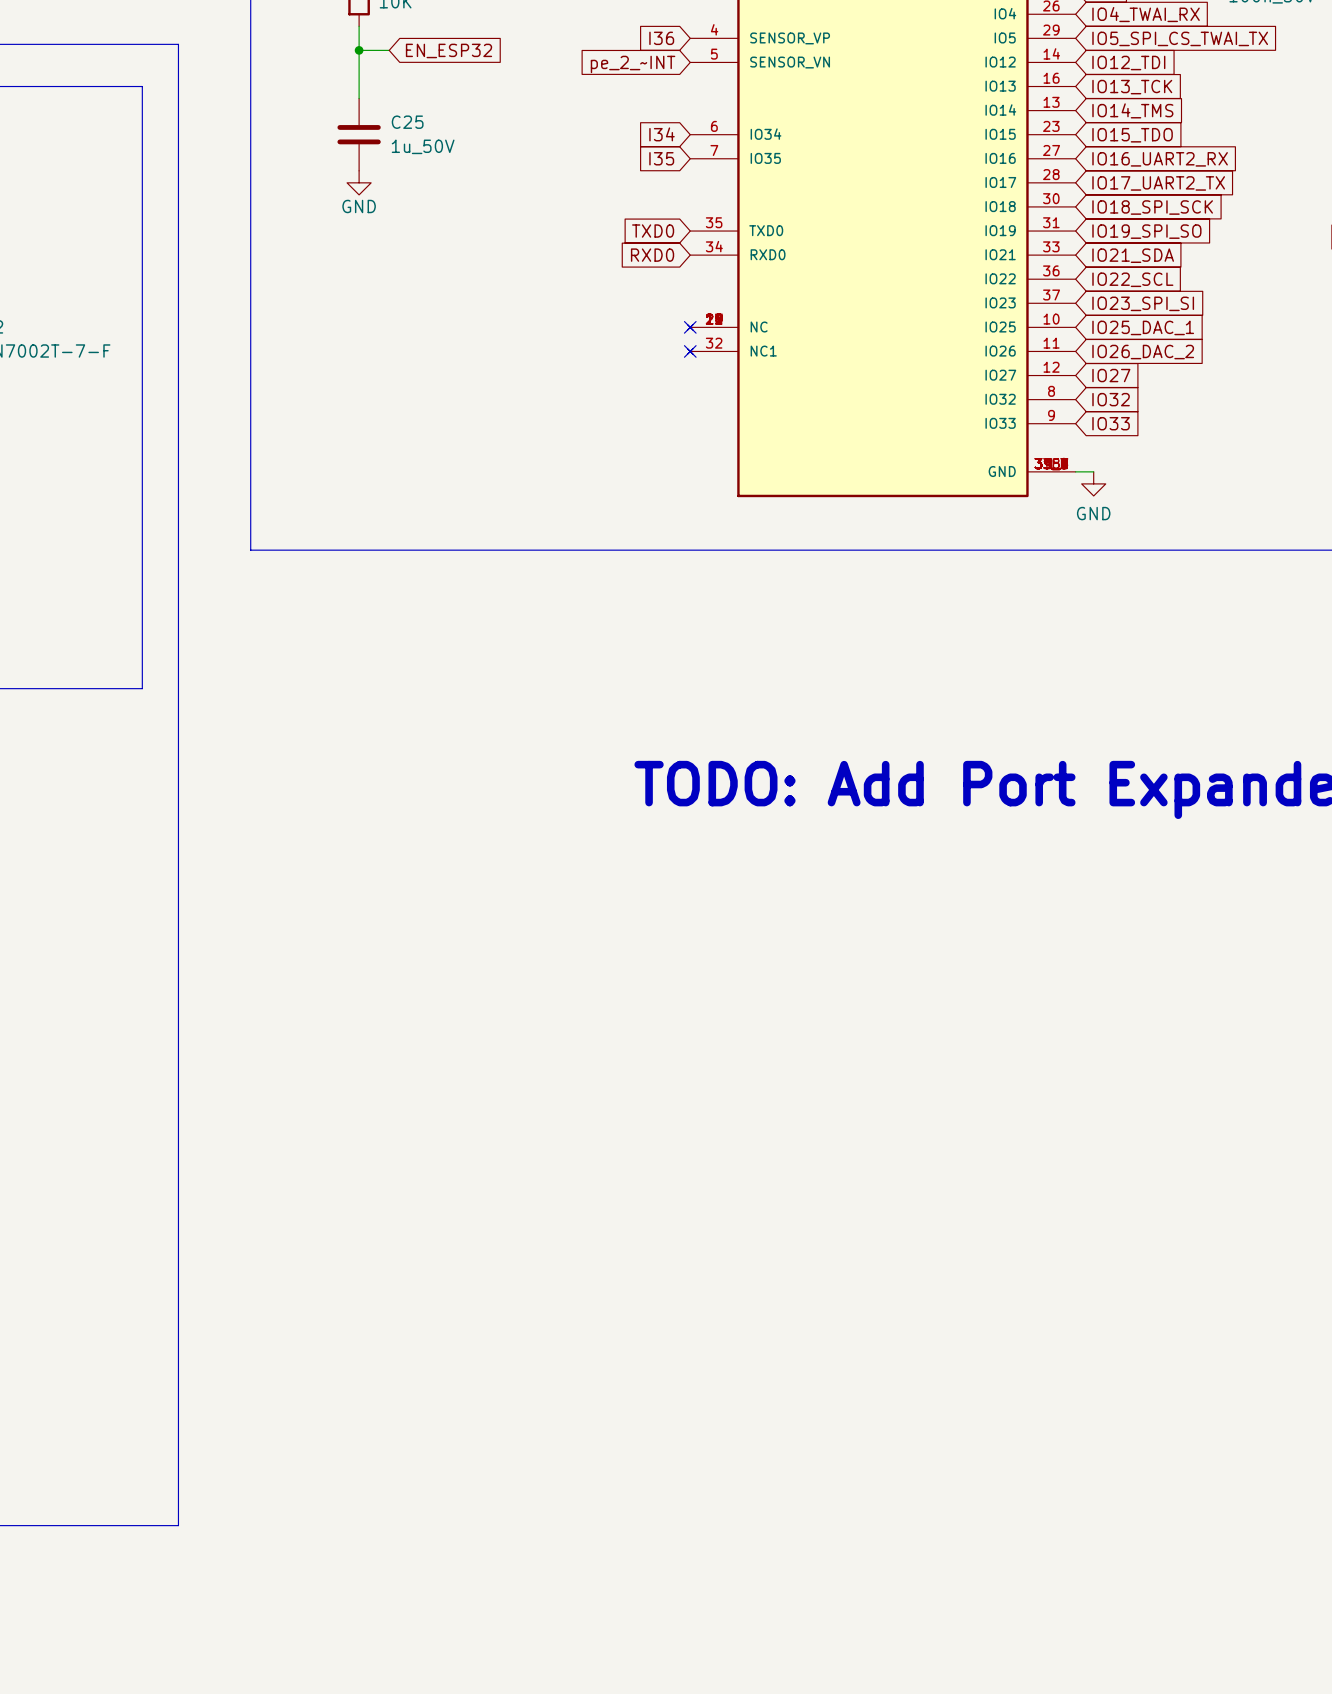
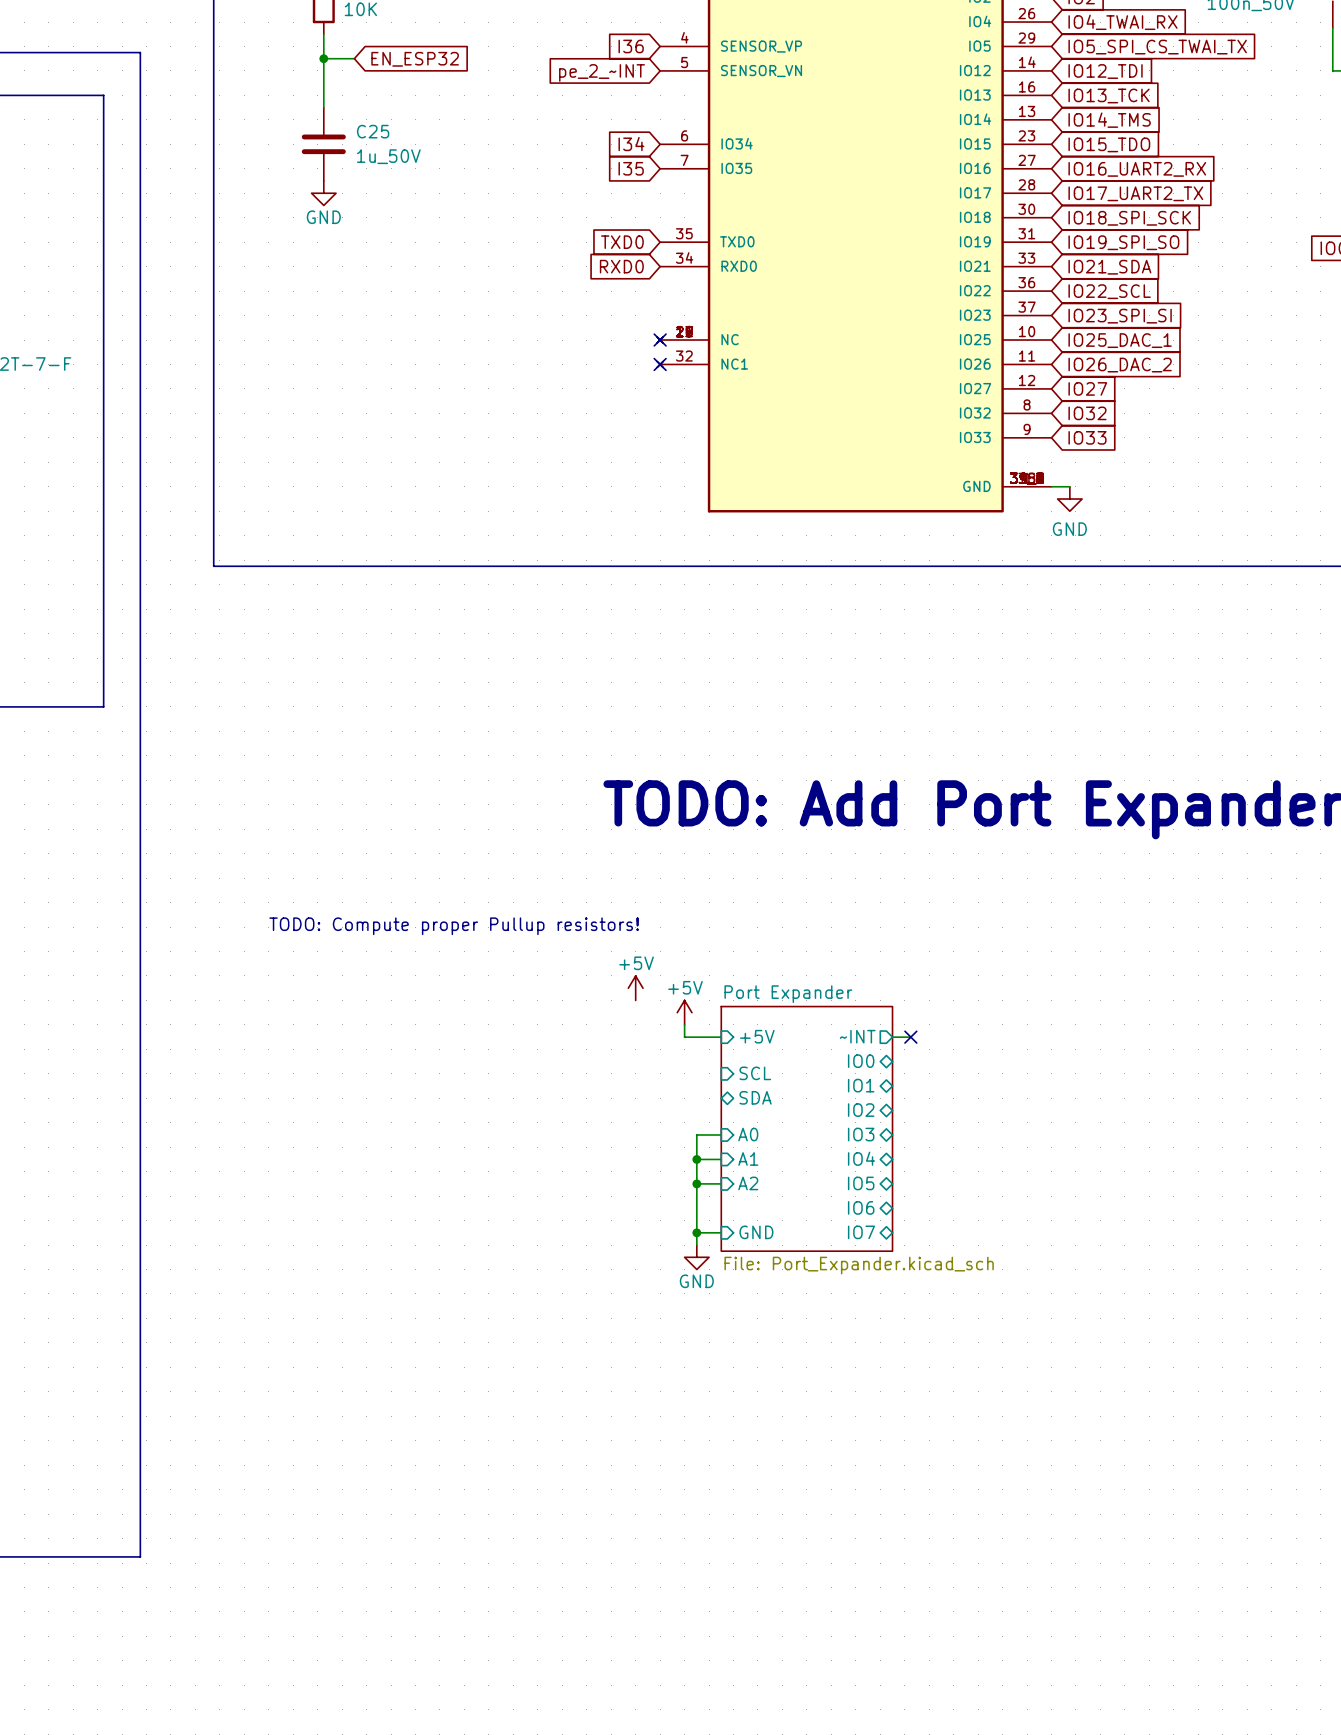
text: none -> TODO: Compute proper Pullup resistors! (454, 926)
power symbol: none -> +5V (635, 988)
power symbol: none -> +5V (684, 1012)
wire: none -> (684, 1024) (684, 1037) (721, 1037)
sheet pin: none -> +5V (757, 1036)
sheet pin: none -> ~INT (857, 1036)
wire: none -> (892, 1037) (910, 1037)
no-connect mark: none -> (910, 1037)
sheet pin: none -> IO0 (861, 1061)
sheet pin: none -> SCL (755, 1073)
sheet pin: none -> IO1 (861, 1085)
sheet pin: none -> SDA (755, 1097)
sheet pin: none -> IO2 (861, 1110)
sheet Port Expander: none -> File: Port_Expander.kicad_sch (806, 1128)
sheet pin: none -> A0 (748, 1134)
sheet pin: none -> IO3 (861, 1134)
wire: none -> (721, 1134) (696, 1134) (696, 1245)
sheet pin: none -> A1 (748, 1158)
sheet pin: none -> IO4 (861, 1158)
wire: none -> (696, 1159) (721, 1159)
junction: none -> (696, 1159)
sheet pin: none -> A2 (748, 1183)
sheet pin: none -> IO5 (861, 1183)
wire: none -> (696, 1183) (721, 1183)
junction: none -> (696, 1183)
sheet pin: none -> IO6 (861, 1207)
wire: none -> (696, 1232) (721, 1232)
junction: none -> (696, 1232)
sheet pin: none -> GND (756, 1232)
sheet pin: none -> IO7 (861, 1232)
power symbol: none -> GND (696, 1257)

